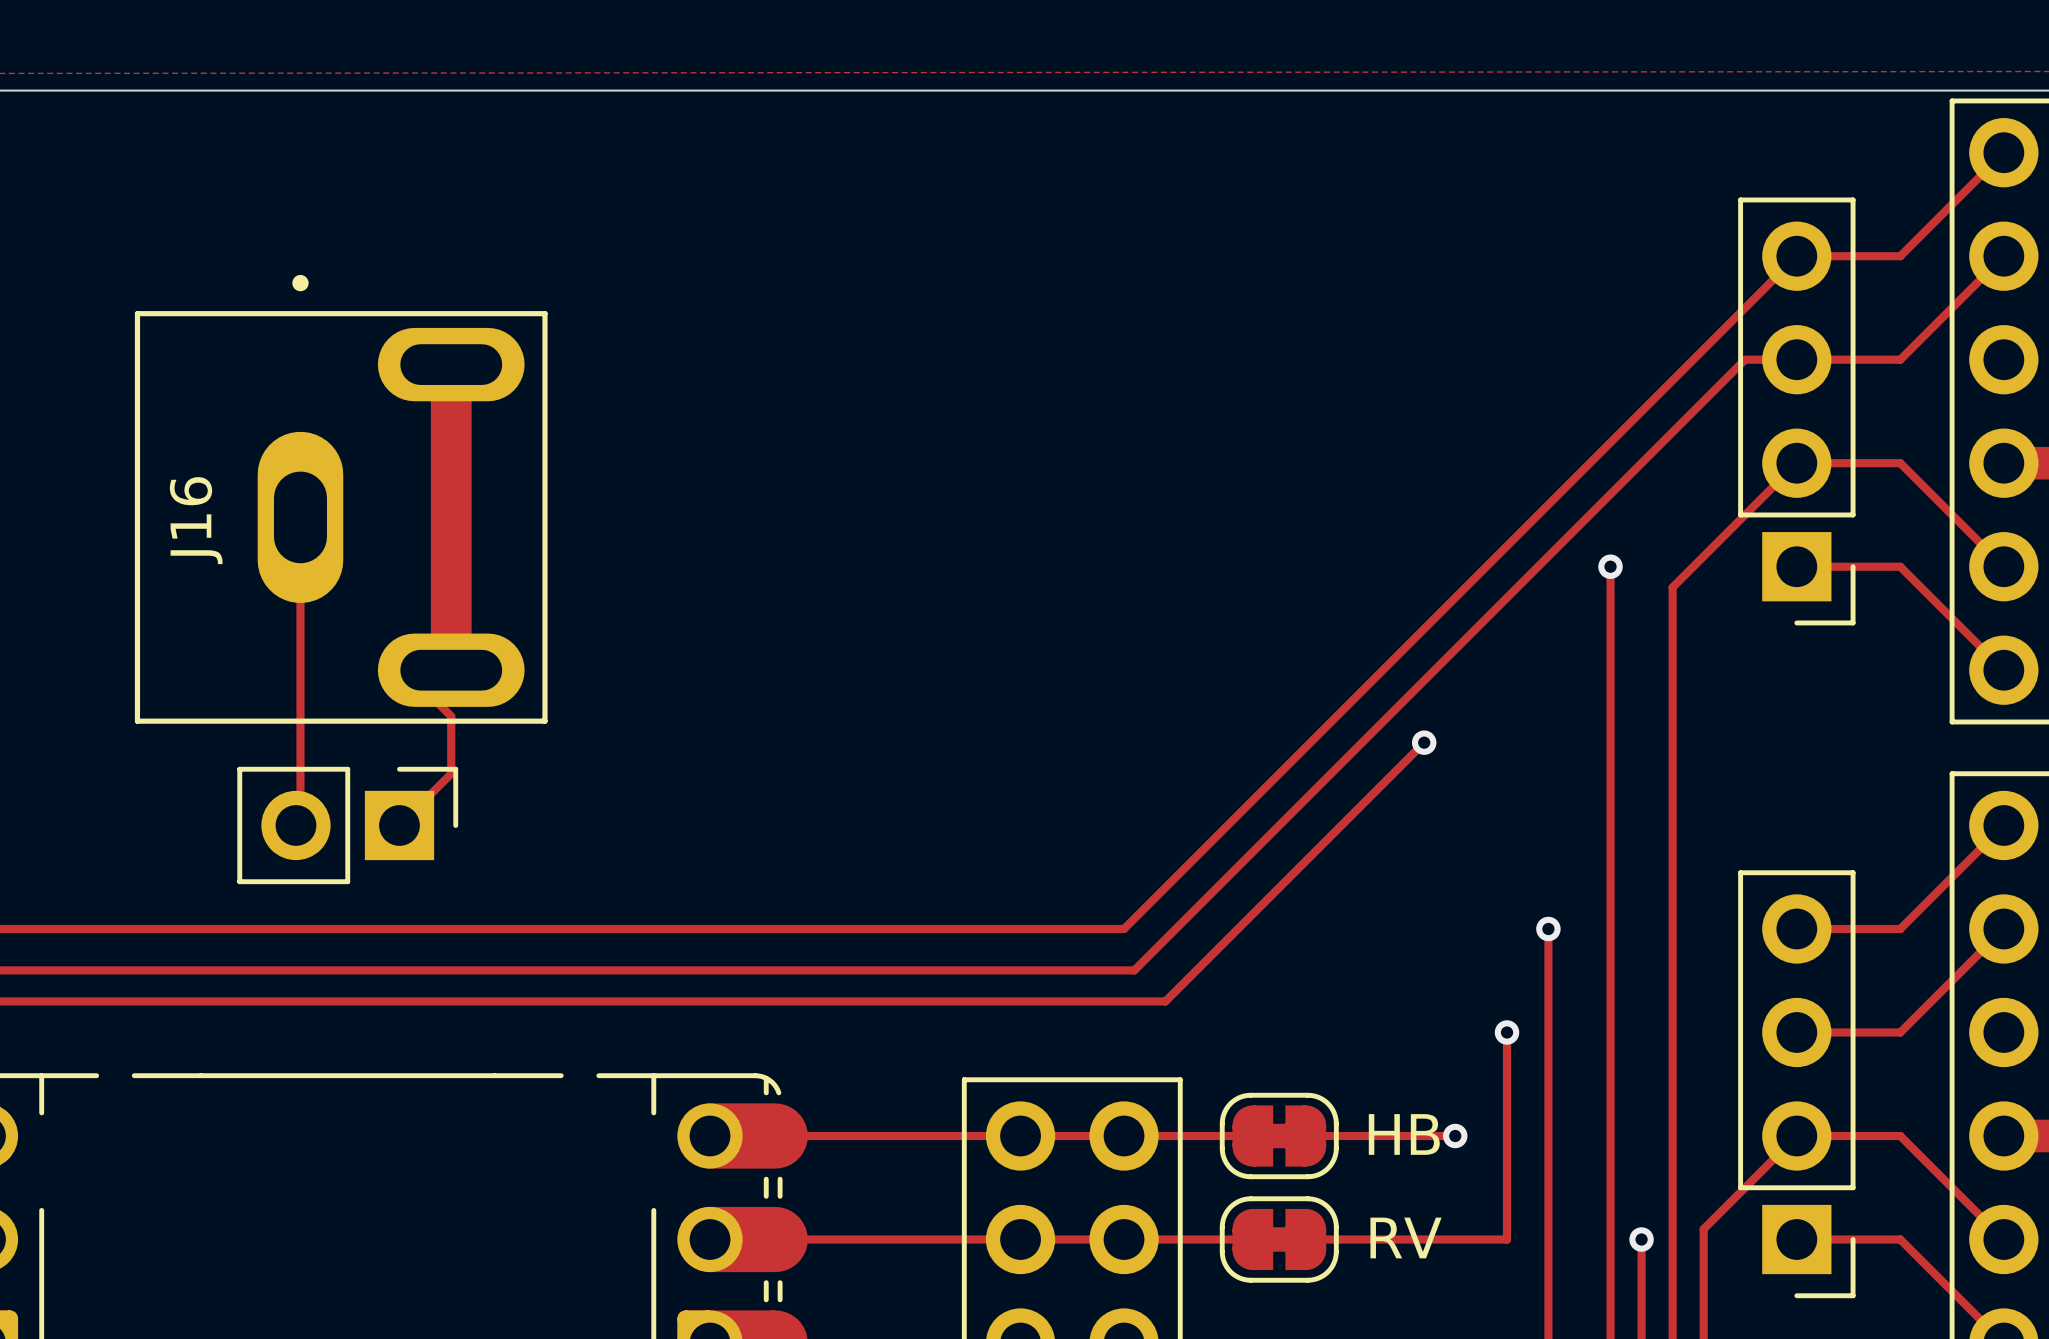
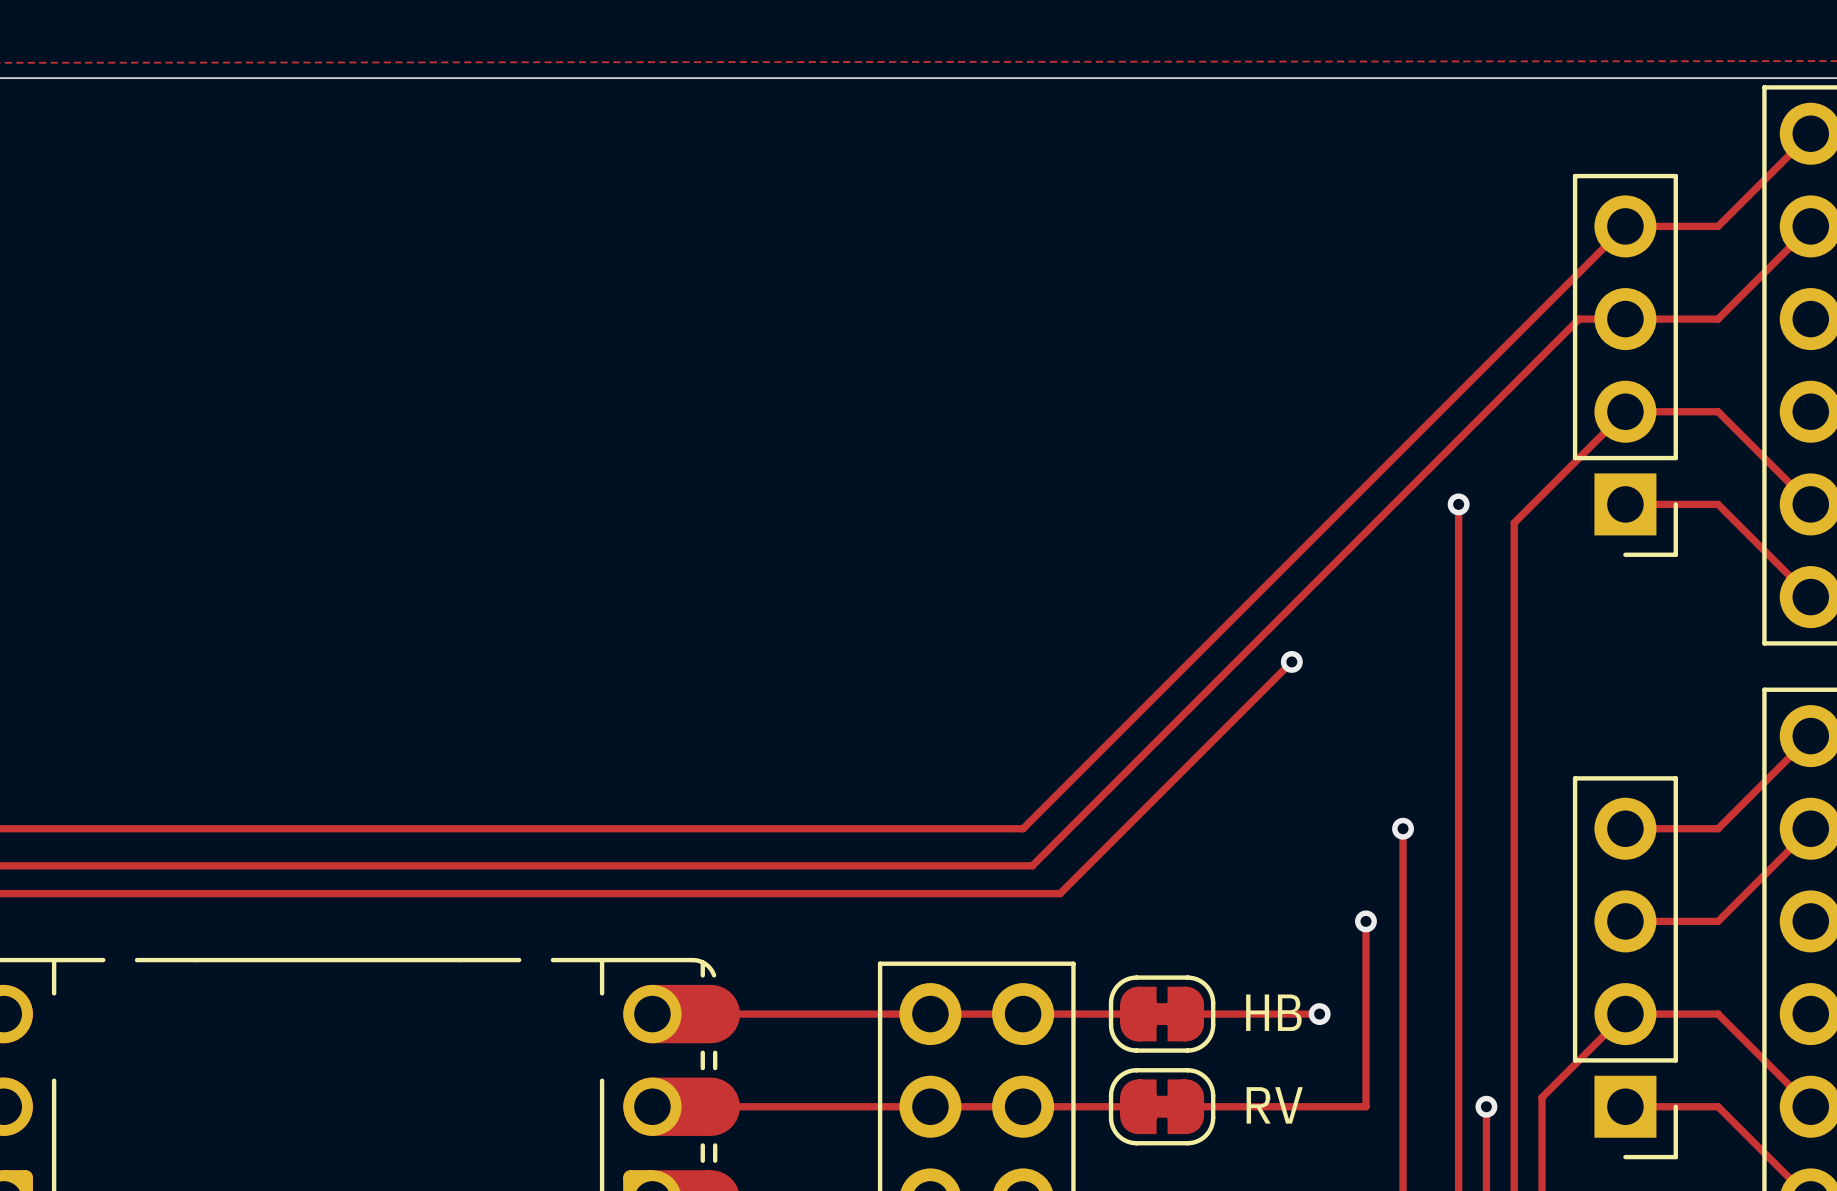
J16: (341, 499) -> none
track: (300, 517) (300, 821) (295, 825) -> none
track: (428, 693) (451, 716) (451, 773) (399, 825) -> none
part: (347, 825) -> none

